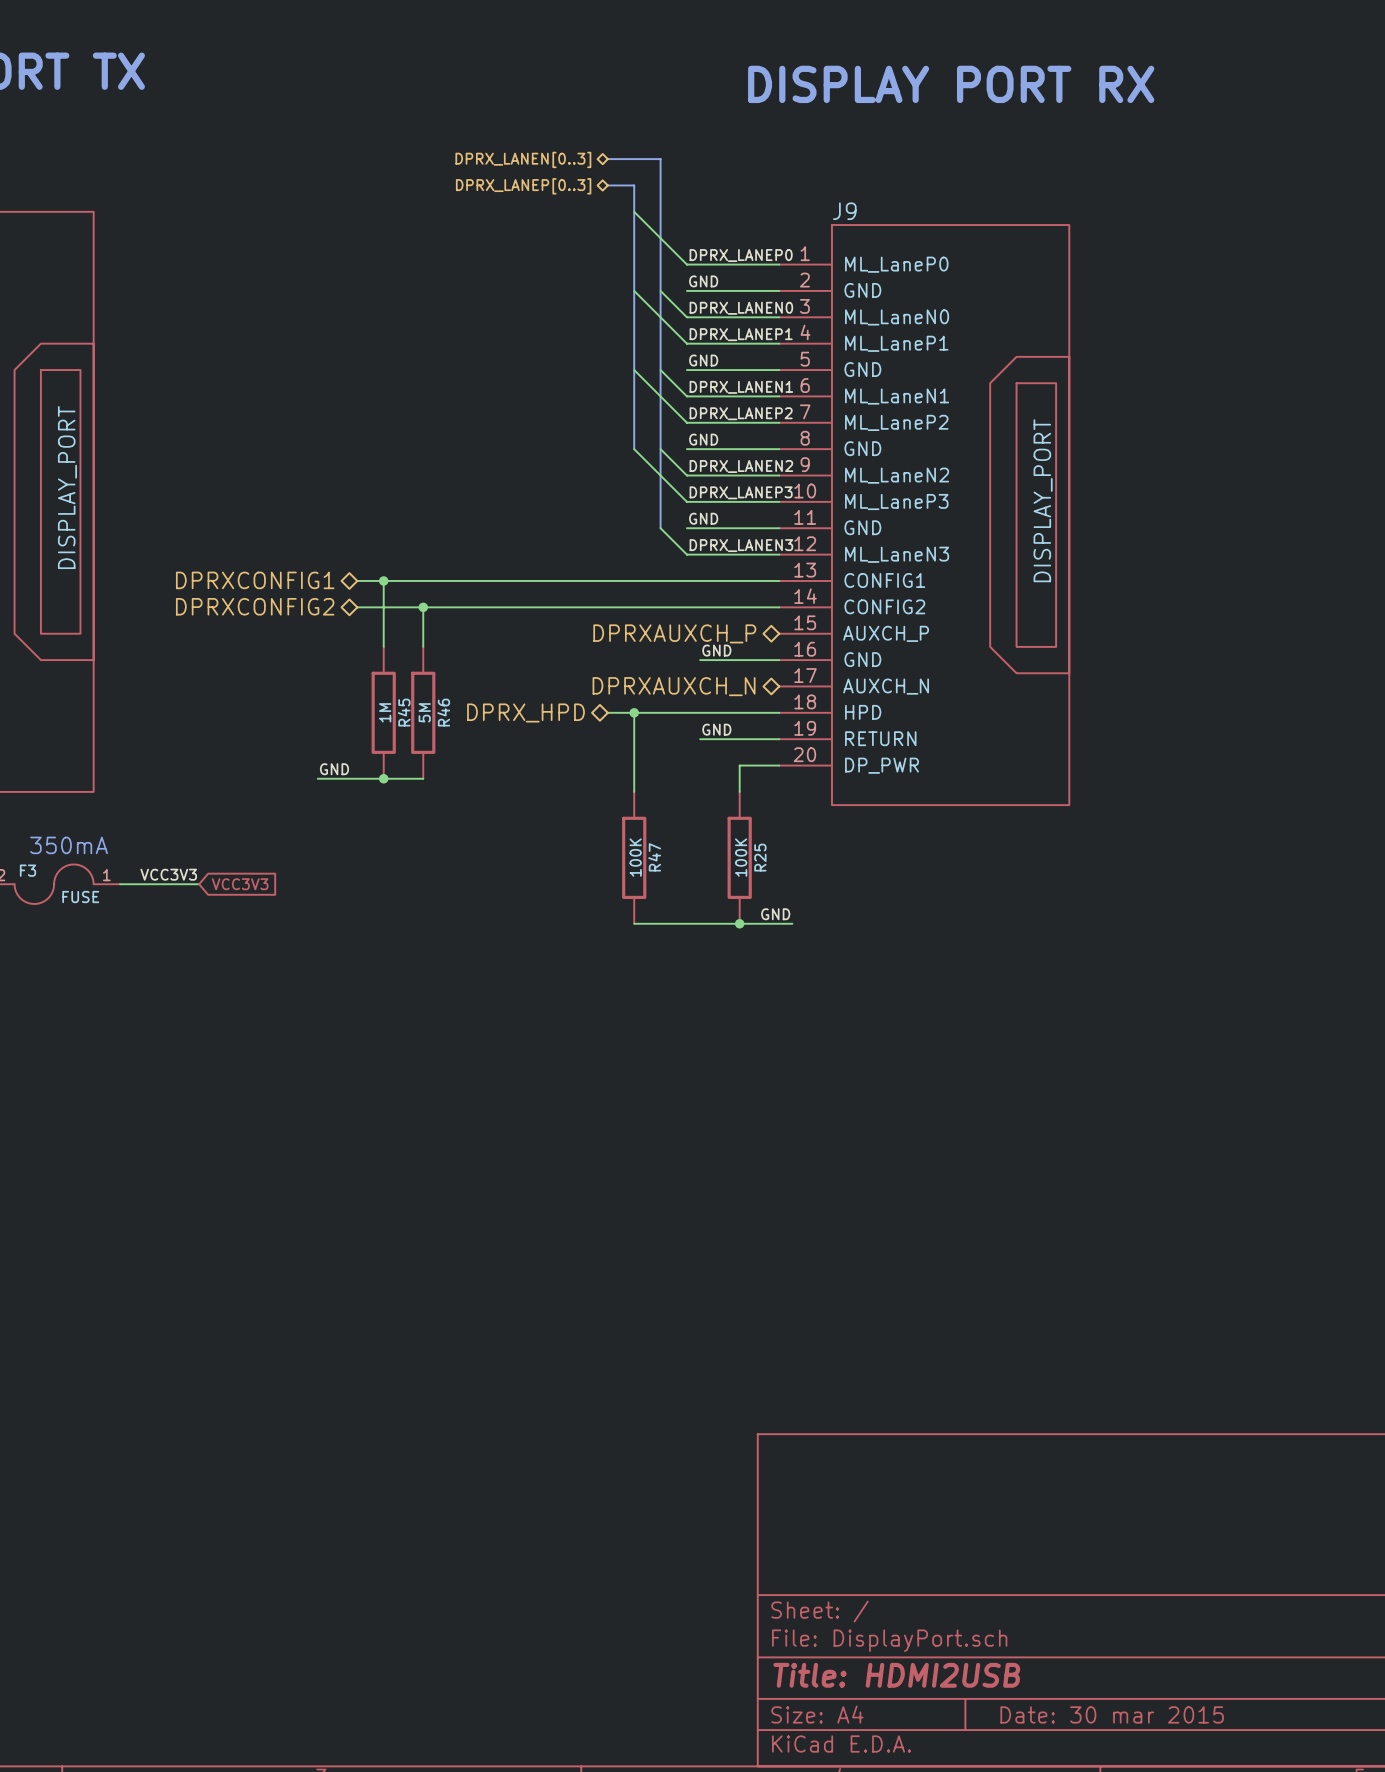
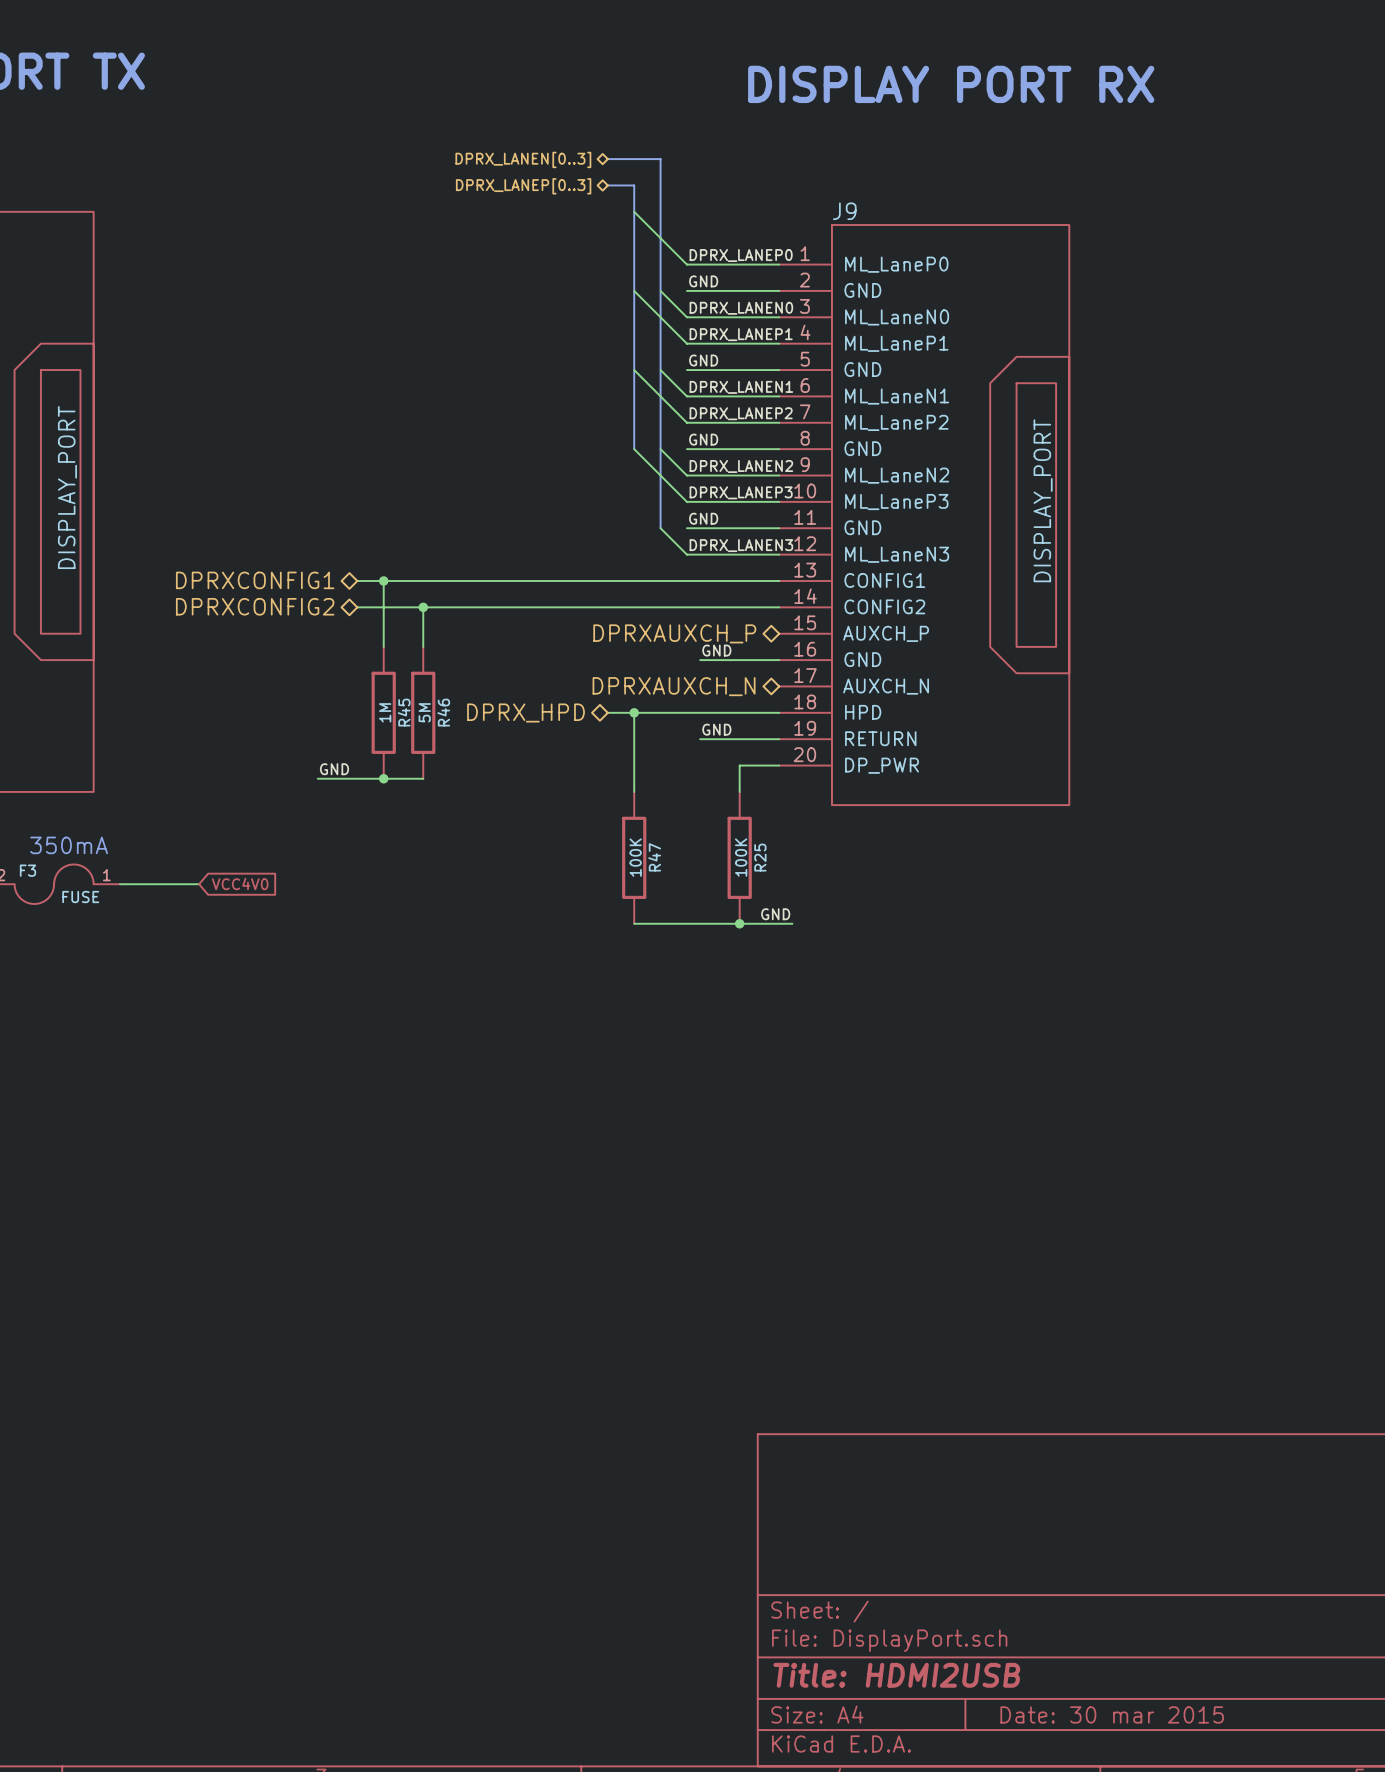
label: VCC3V3 (168, 874) -> none
global label: VCC3V3 (240, 884) -> VCC4V0 (240, 883)

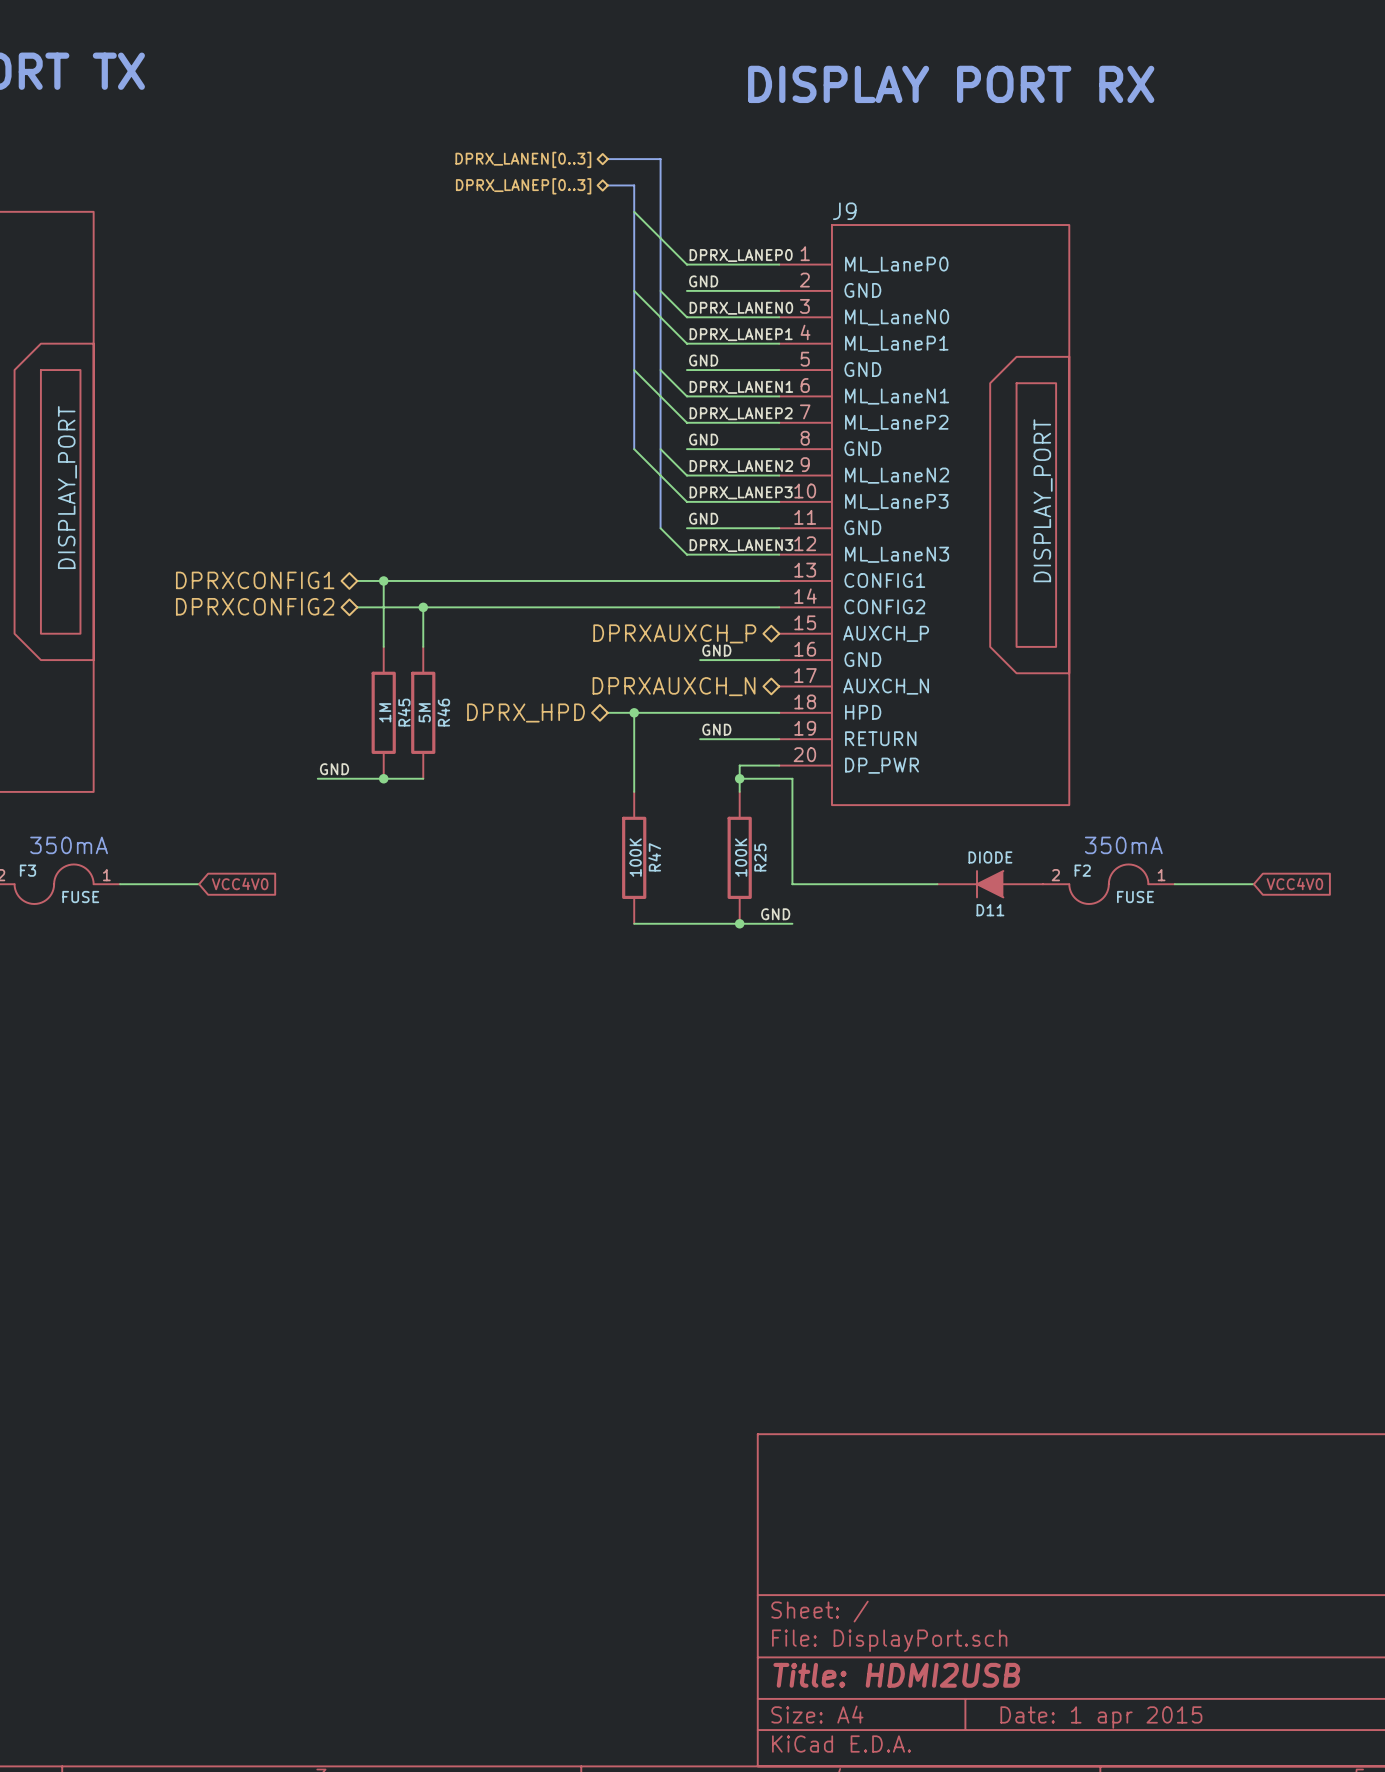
wire: none -> (739, 778) (792, 778) (792, 884) (937, 884)
junction: none -> (739, 778)
text: none -> 350mA (1123, 845)
global label: none -> VCC4V0 (1294, 883)
D11: none -> DIODE (990, 884)
F2: none -> FUSE (1108, 884)
wire: none -> (1174, 884) (1253, 884)
title block: Date: 30 mar 2015 (1112, 1714) -> Date: 1 apr 2015 (1101, 1717)

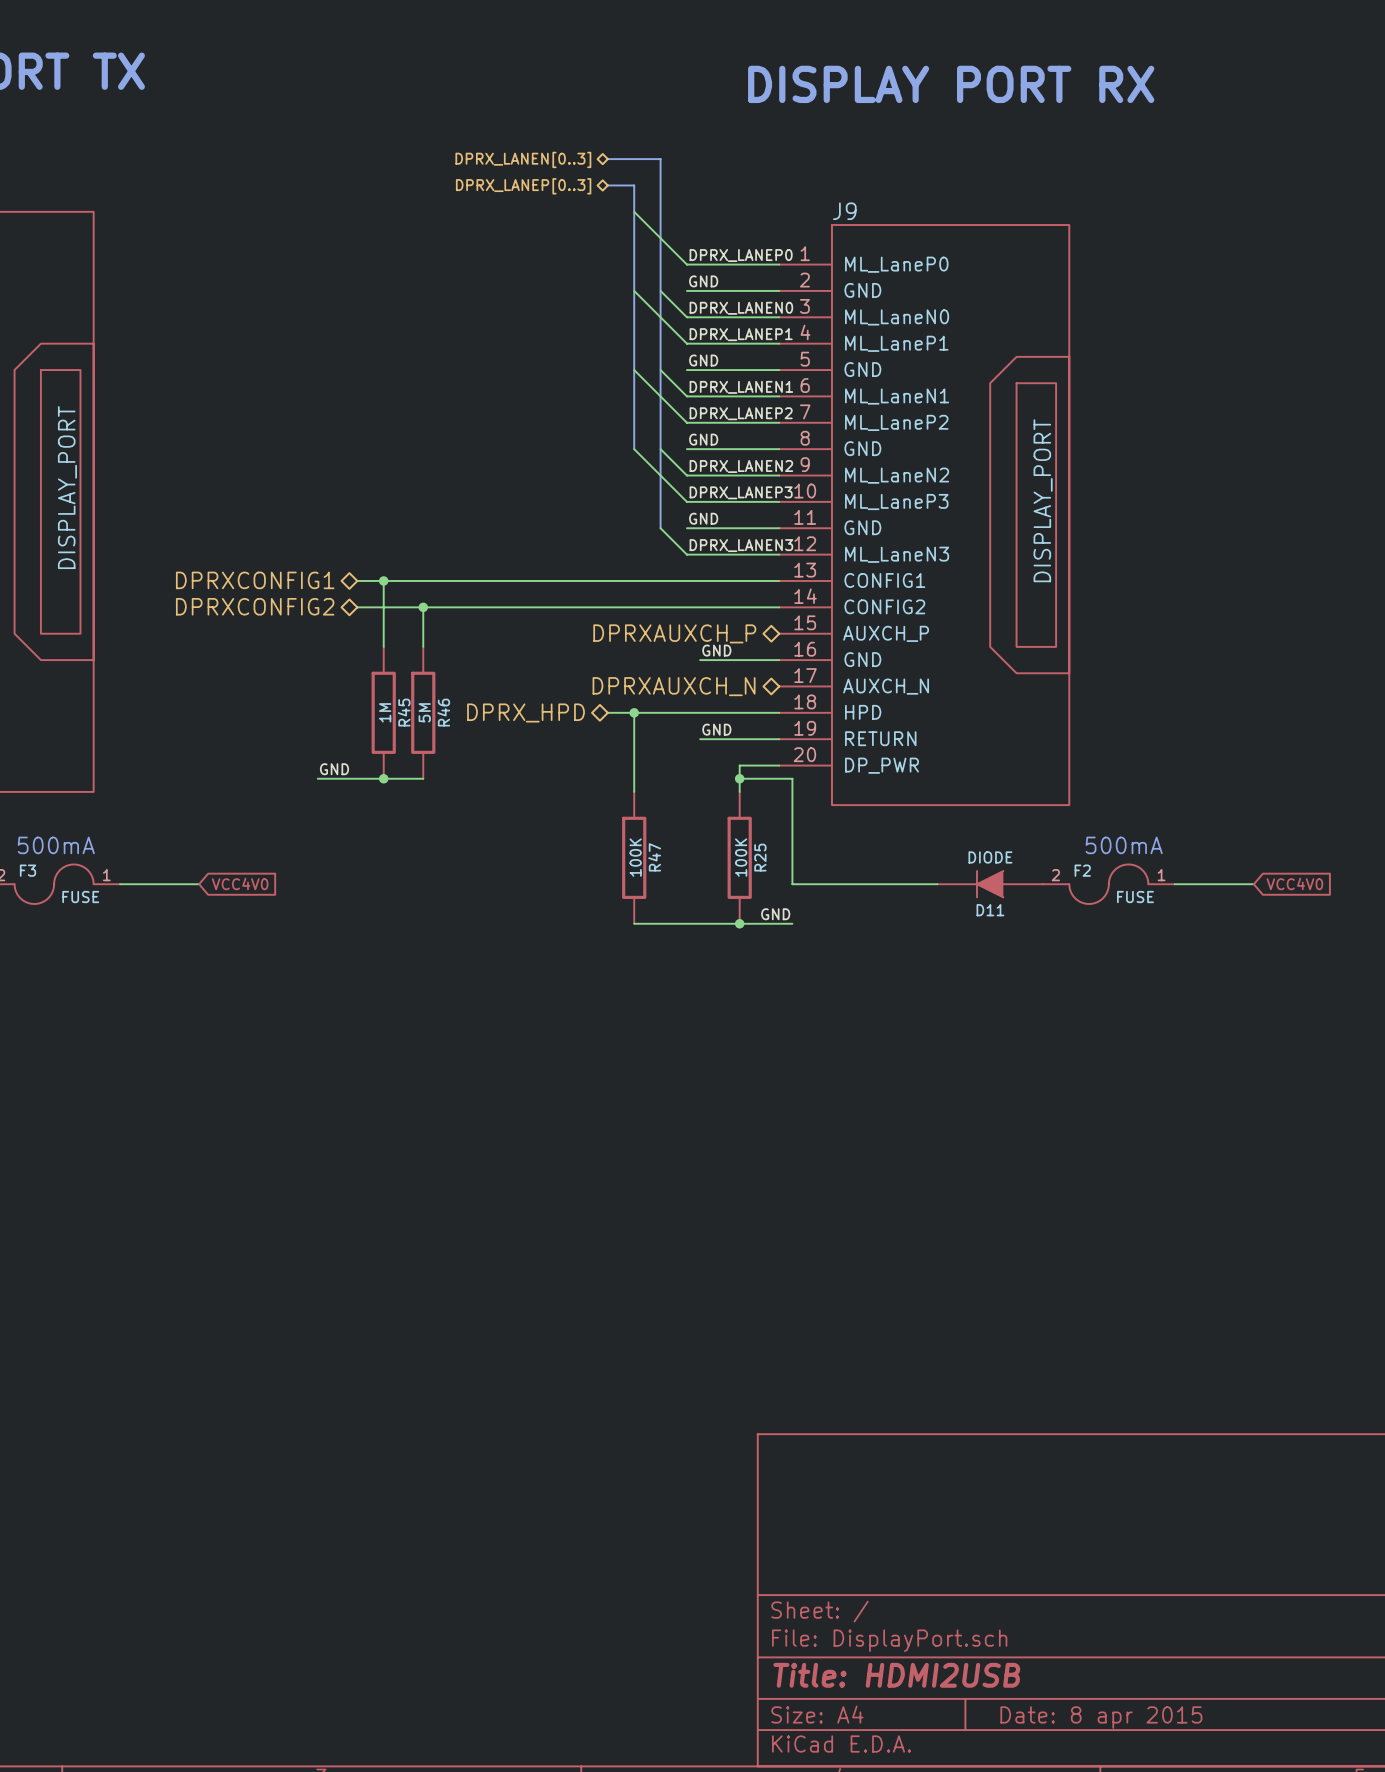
text: 350mA (69, 845) -> 500mA (56, 845)
text: 350mA (1123, 845) -> 500mA (1124, 845)
title block: Date: 1 apr 2015 (1101, 1717) -> Date: 8 apr 2015 (1101, 1717)

